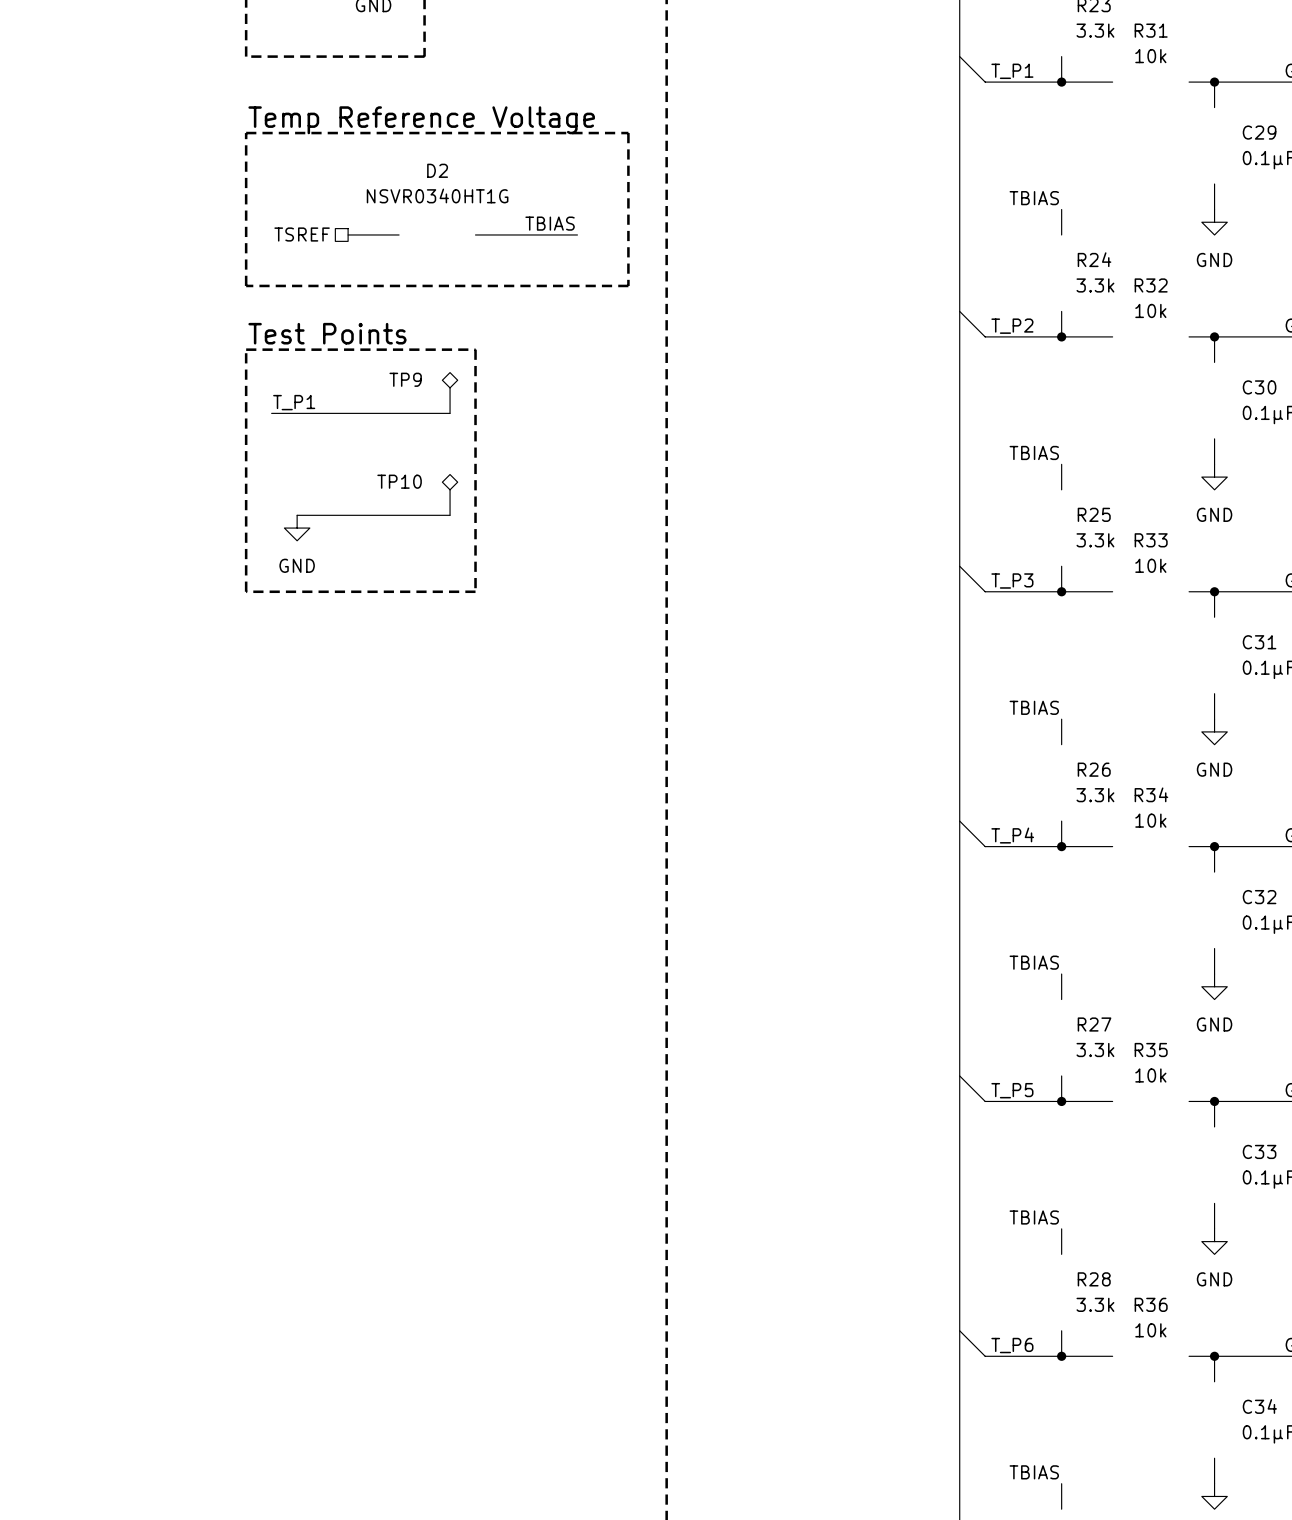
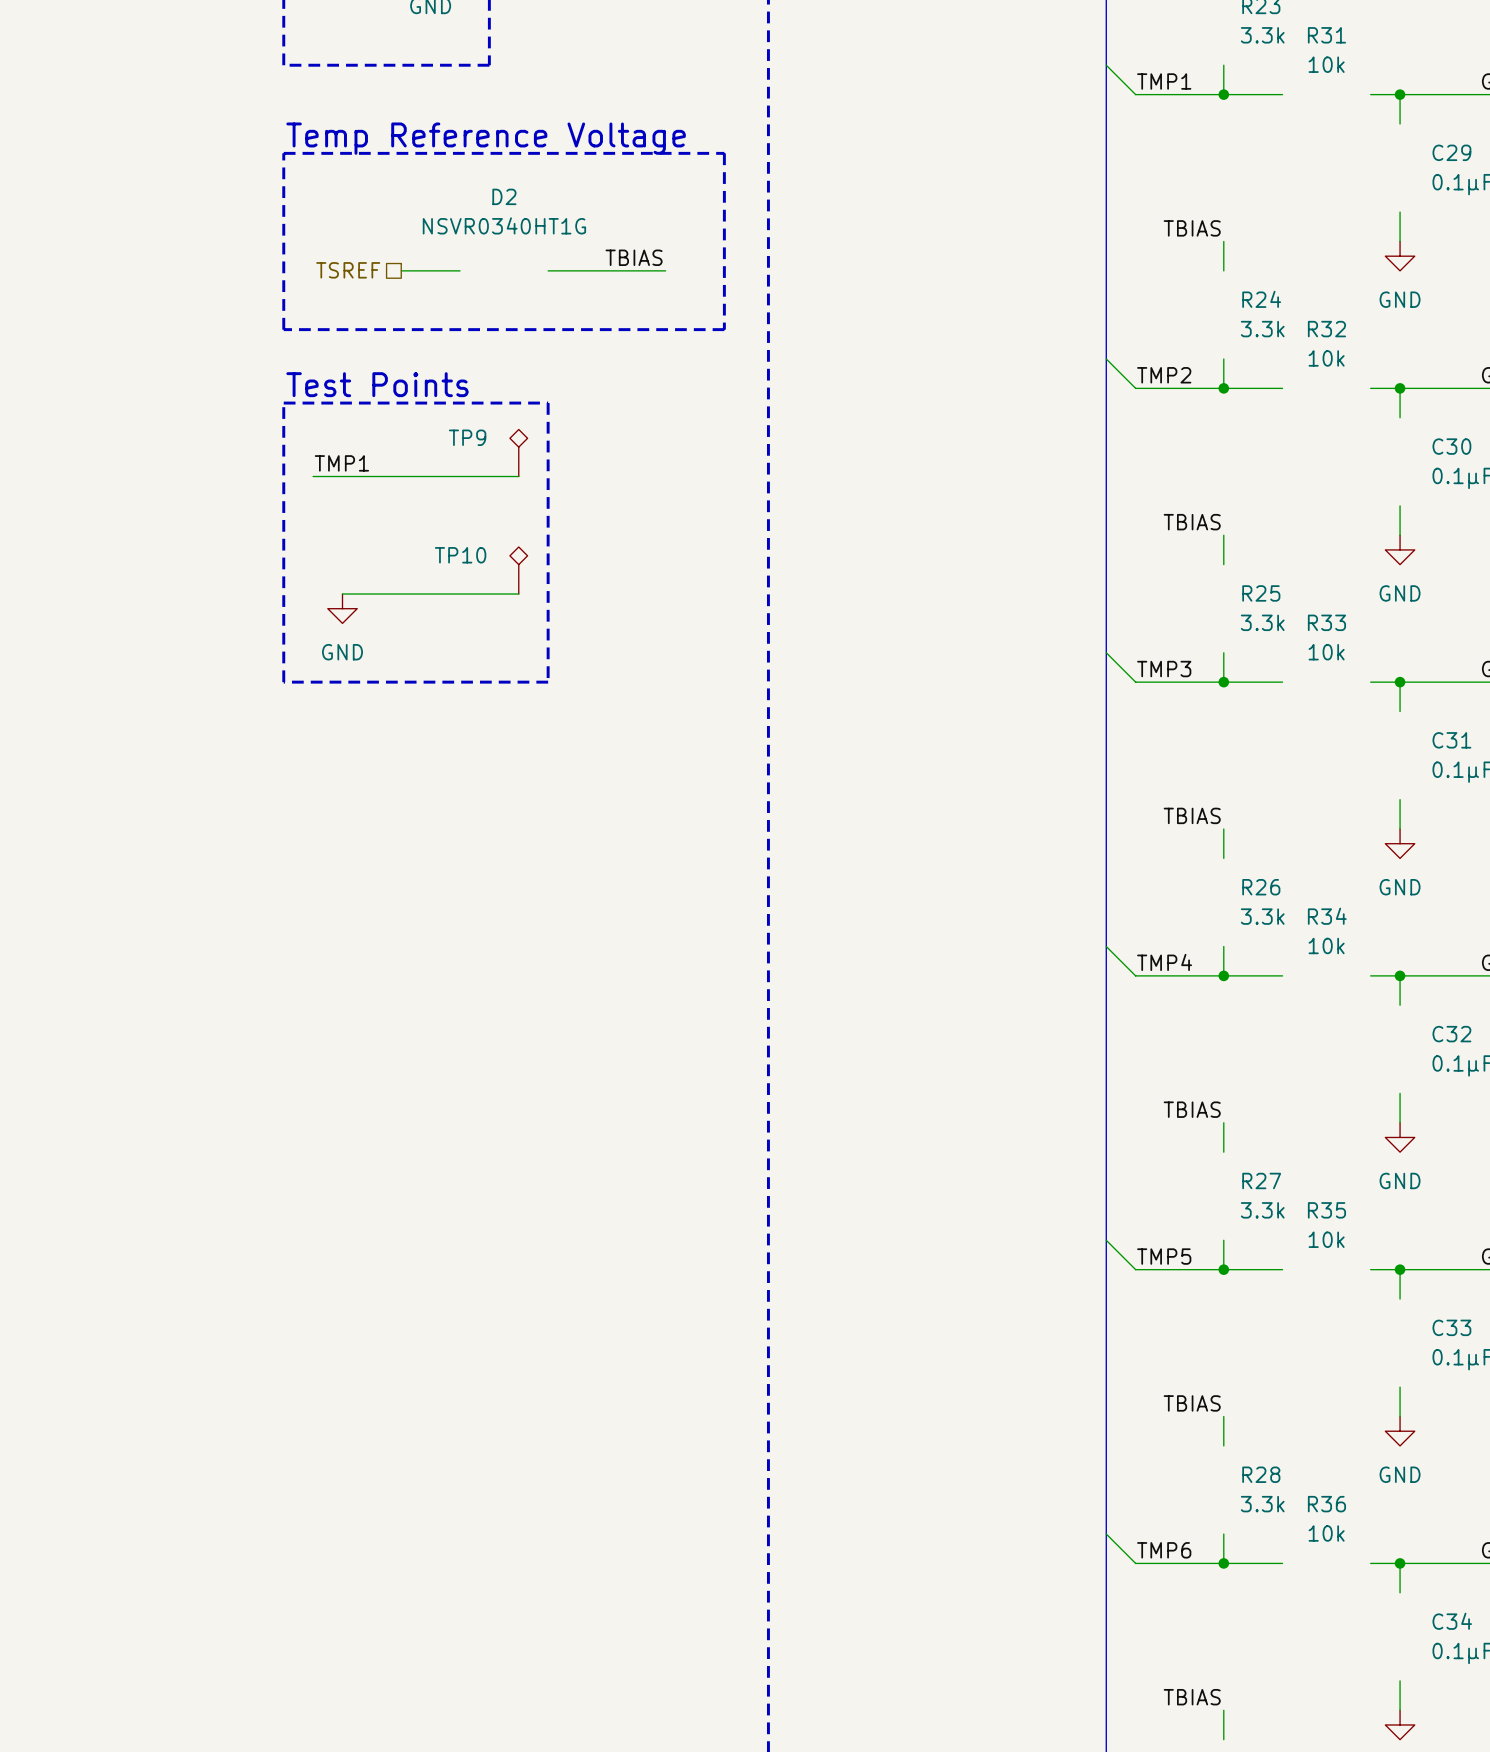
label: T_P1 (1012, 71) -> TMP1 (1164, 81)
label: T_P2 (1012, 326) -> TMP2 (1164, 375)
label: T_P1 (294, 402) -> TMP1 (341, 463)
label: T_P3 (1012, 581) -> TMP3 (1164, 669)
label: T_P4 (1012, 835) -> TMP4 (1164, 962)
label: T_P5 (1012, 1090) -> TMP5 (1164, 1256)
label: T_P6 (1012, 1345) -> TMP6 (1164, 1550)

